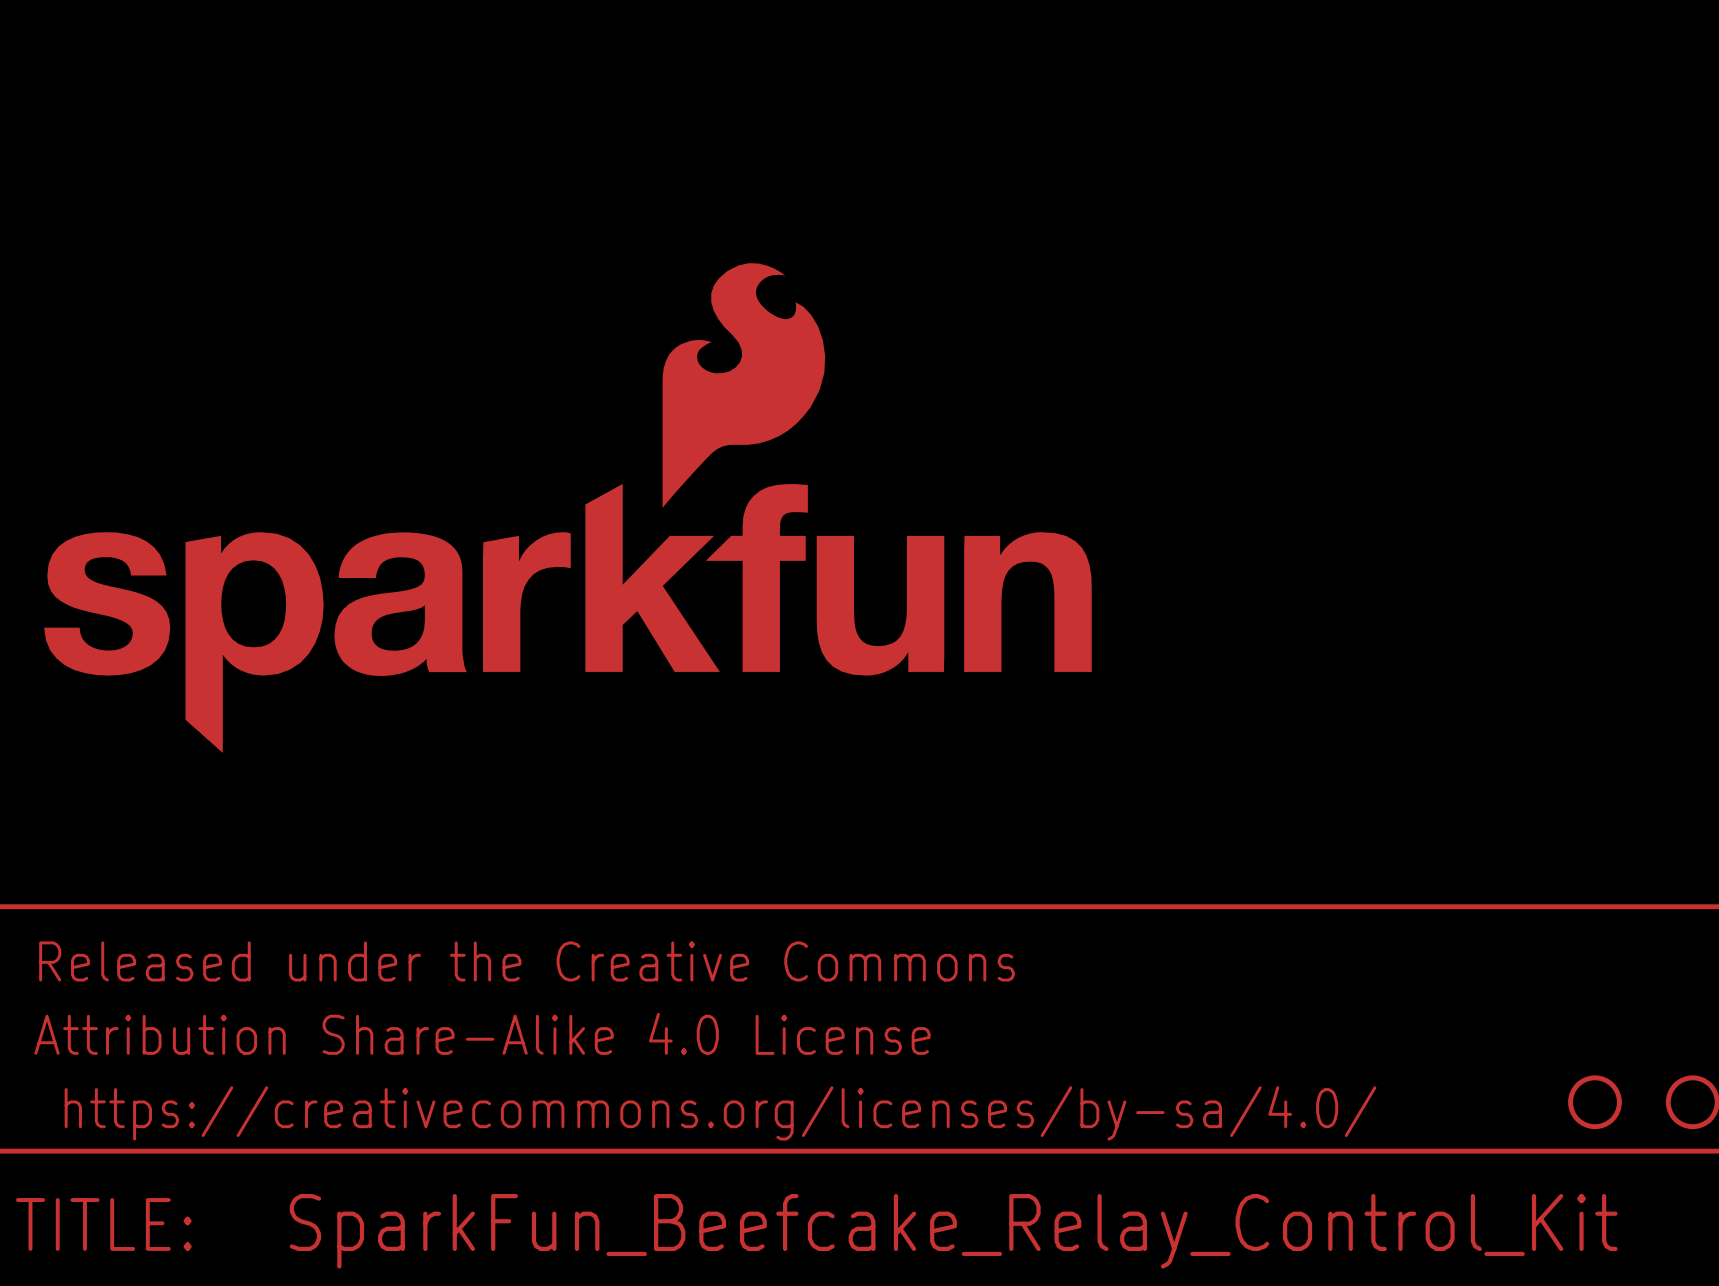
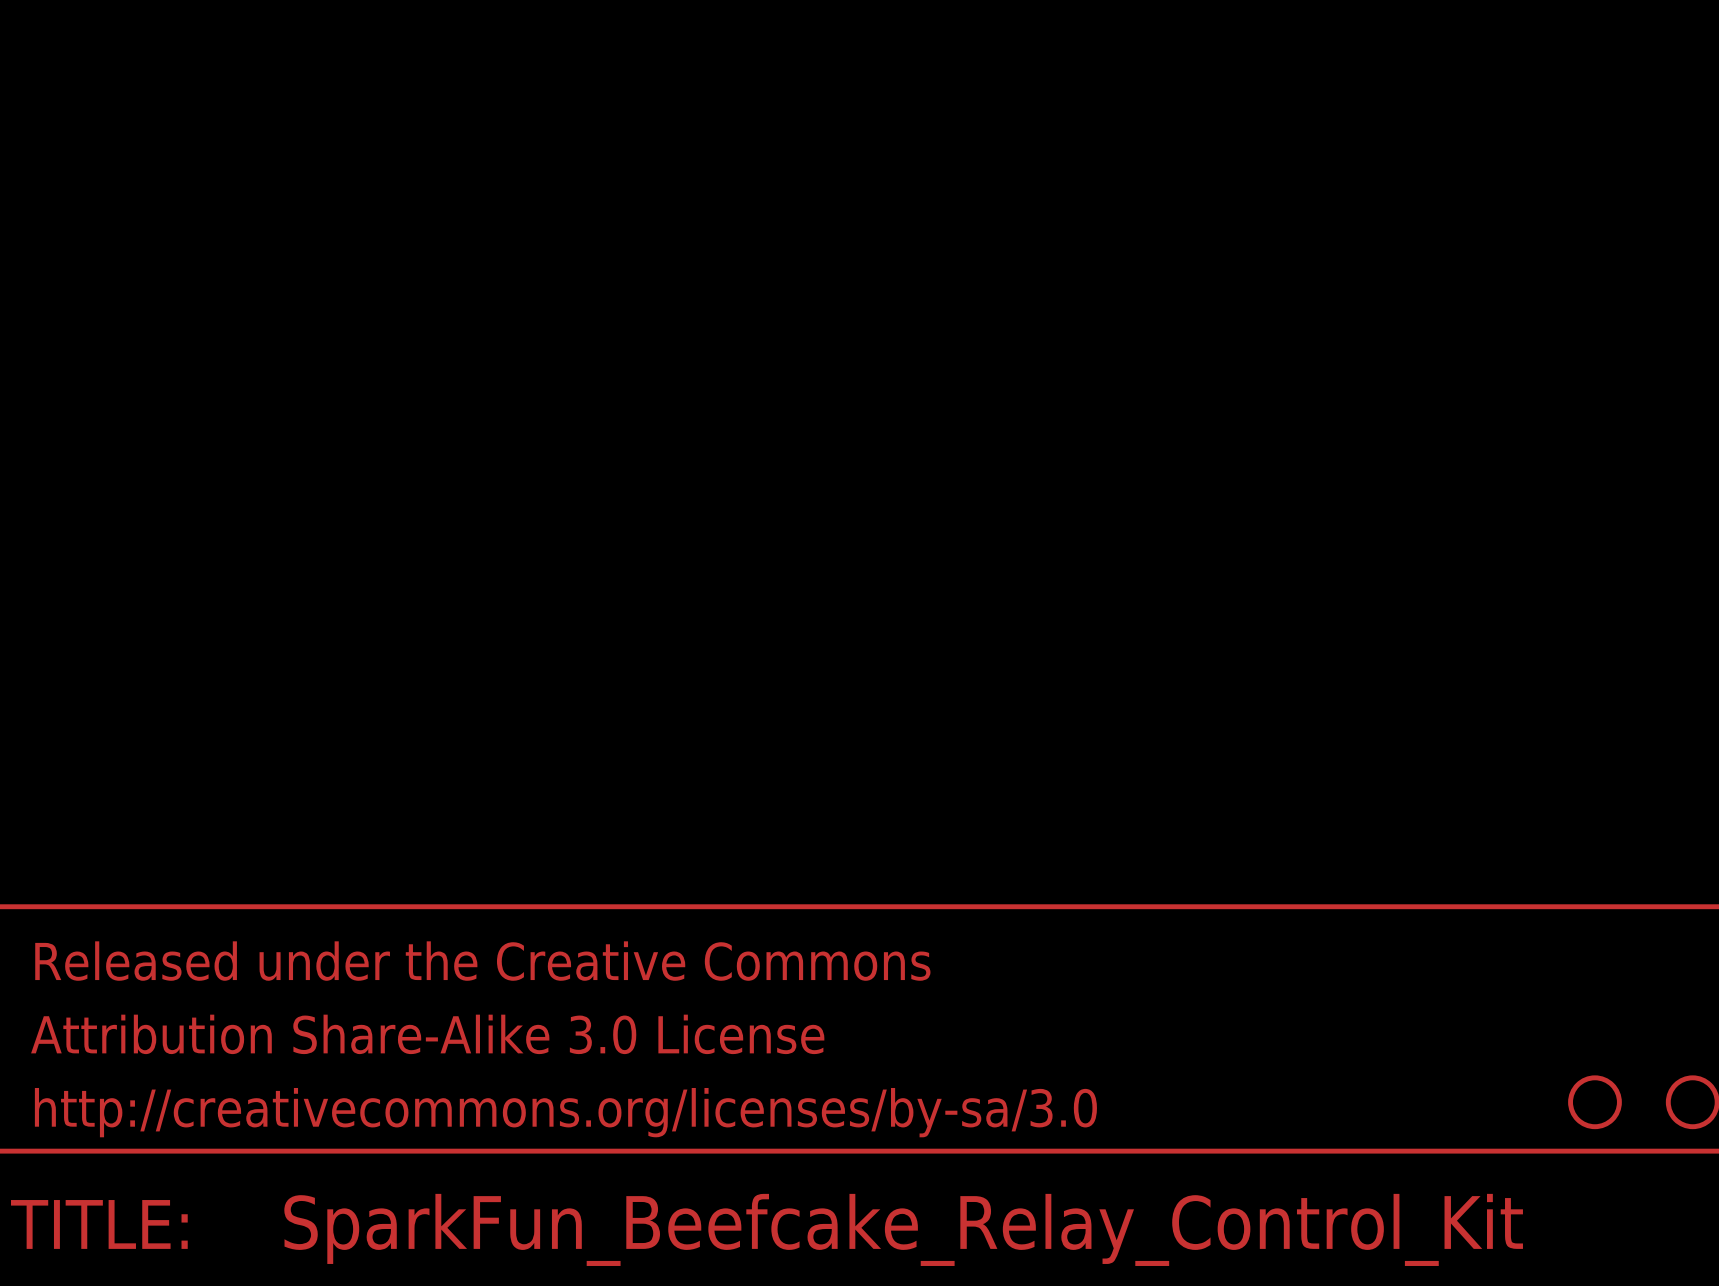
part: (567, 508) -> none
part text: Attribution Share-Alike 4.0 License (482, 1033) -> Attribution Share-Alike 3.0 License (427, 1034)
part text: https://creativecommons.org/licenses/by-sa/4.0/ (720, 1113) -> http://creativecommons.org/licenses/by-sa/3.0 (565, 1112)

